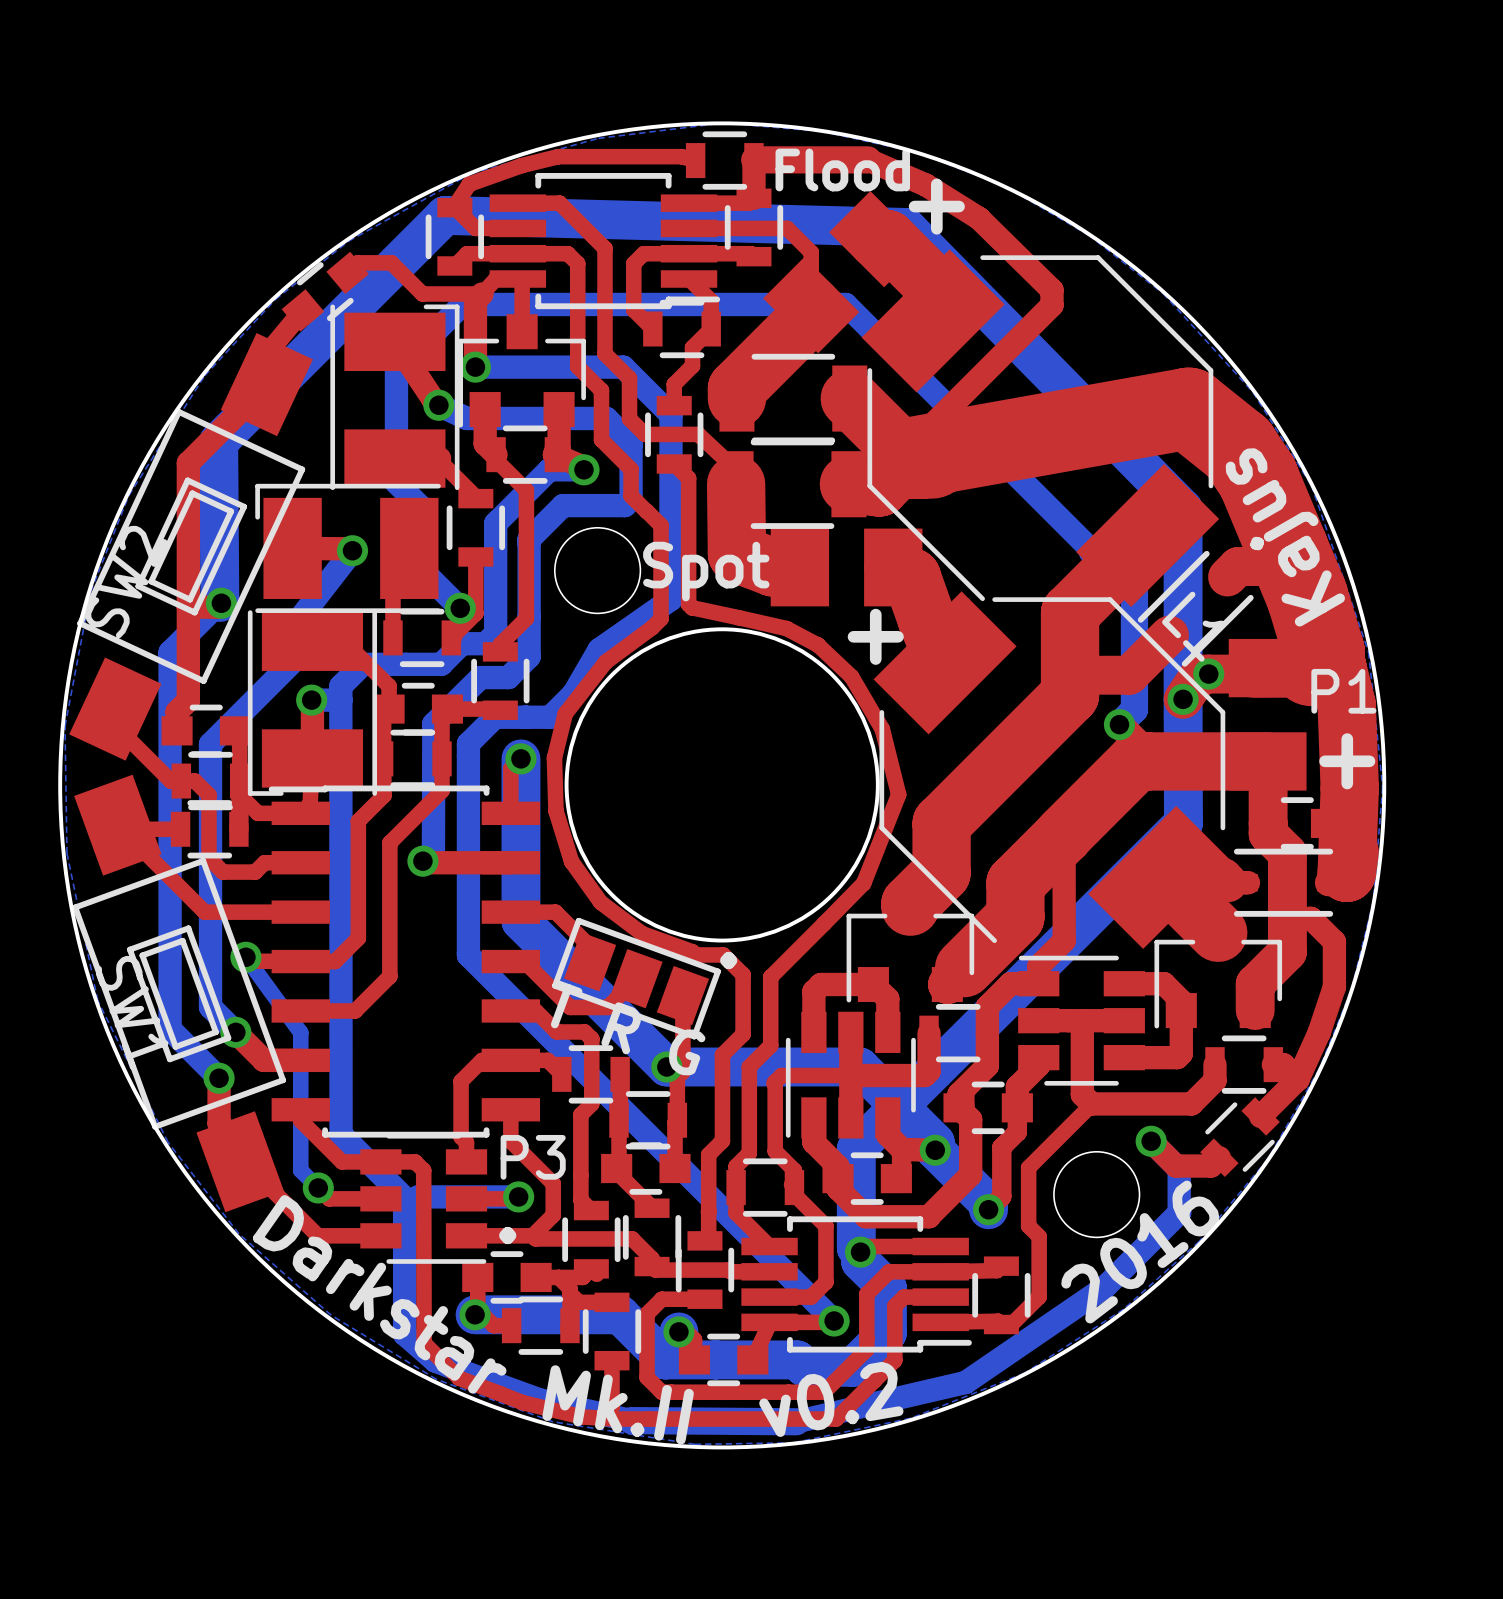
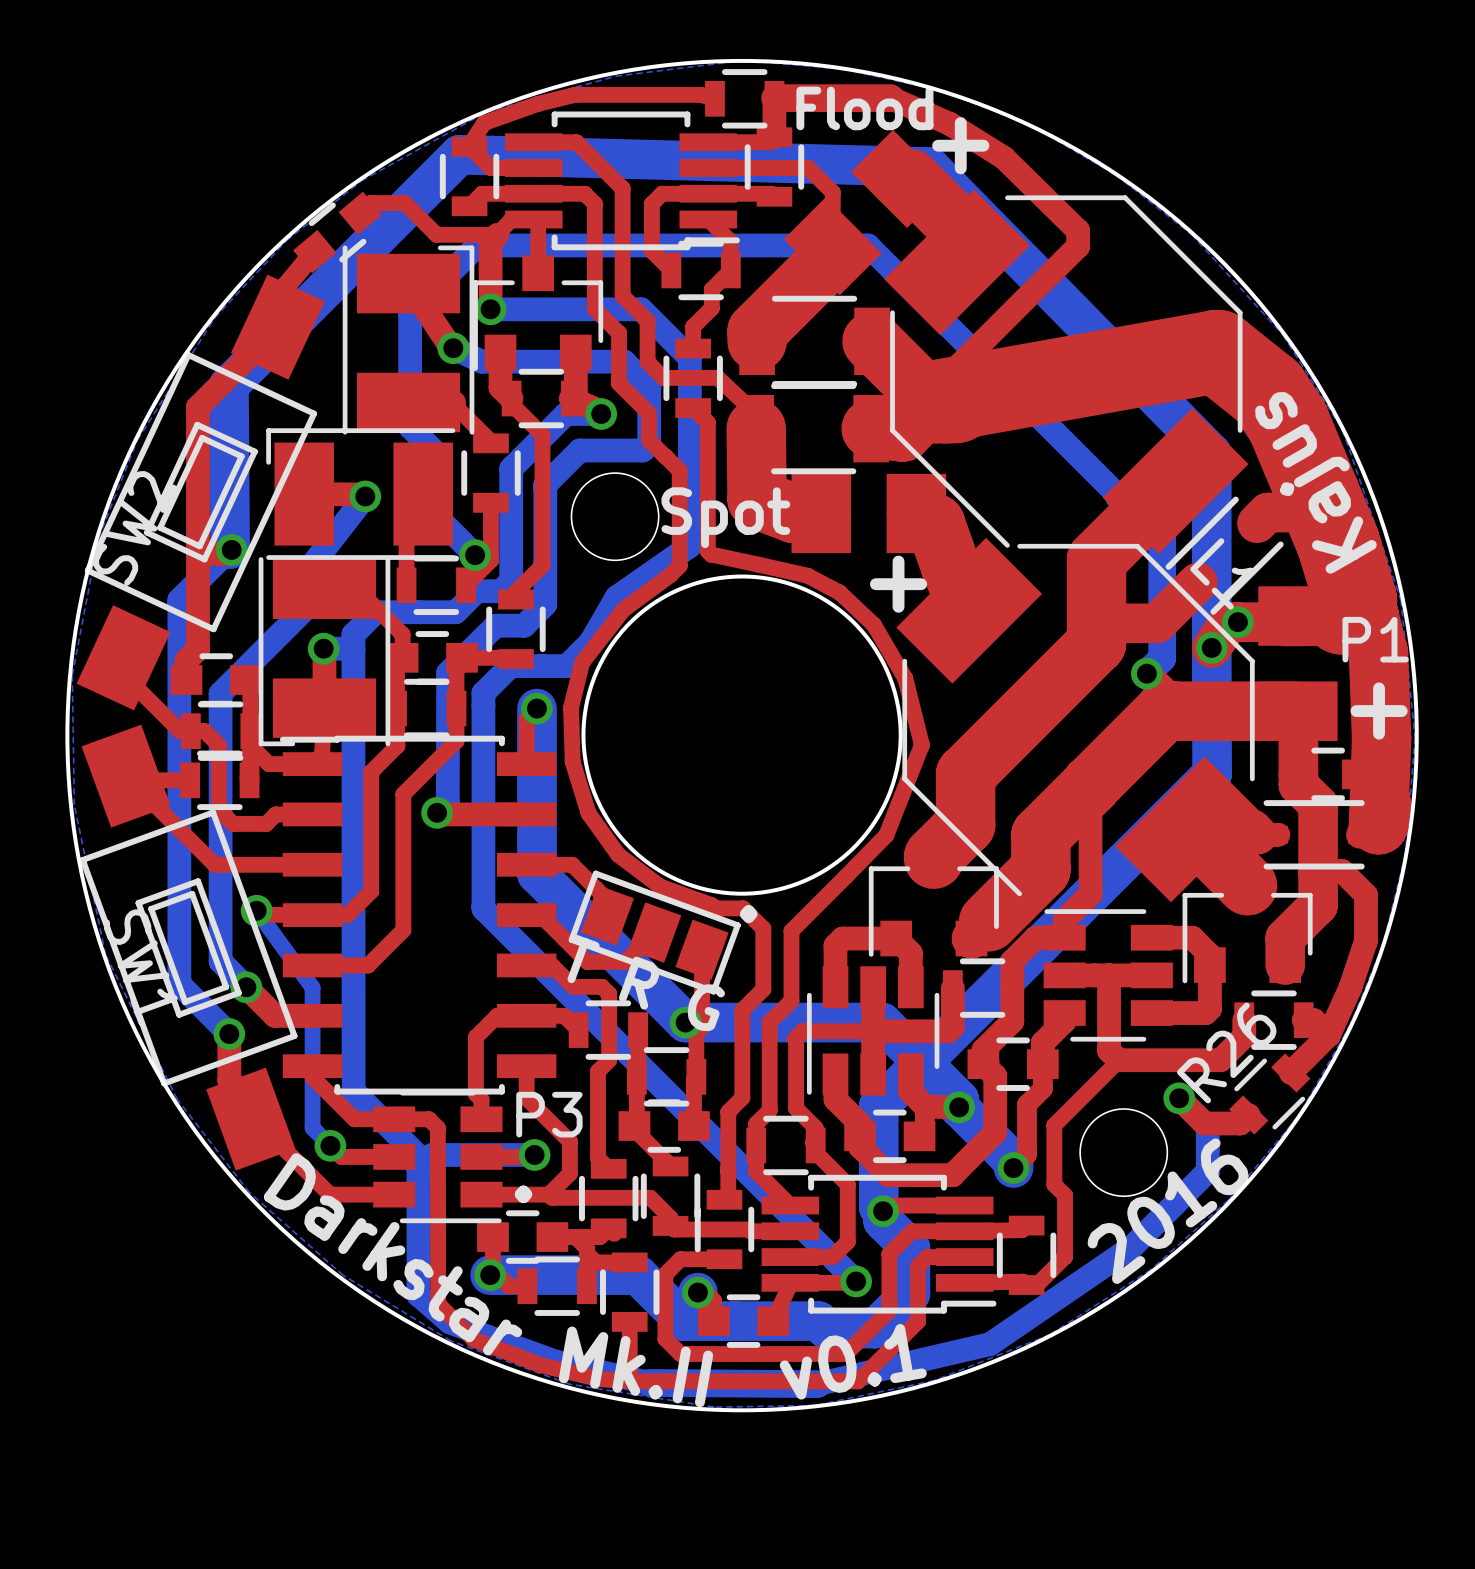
R26 name: none -> R26 (1226, 1052)
text: v0.2 (831, 1399) -> v0.1 (853, 1361)

